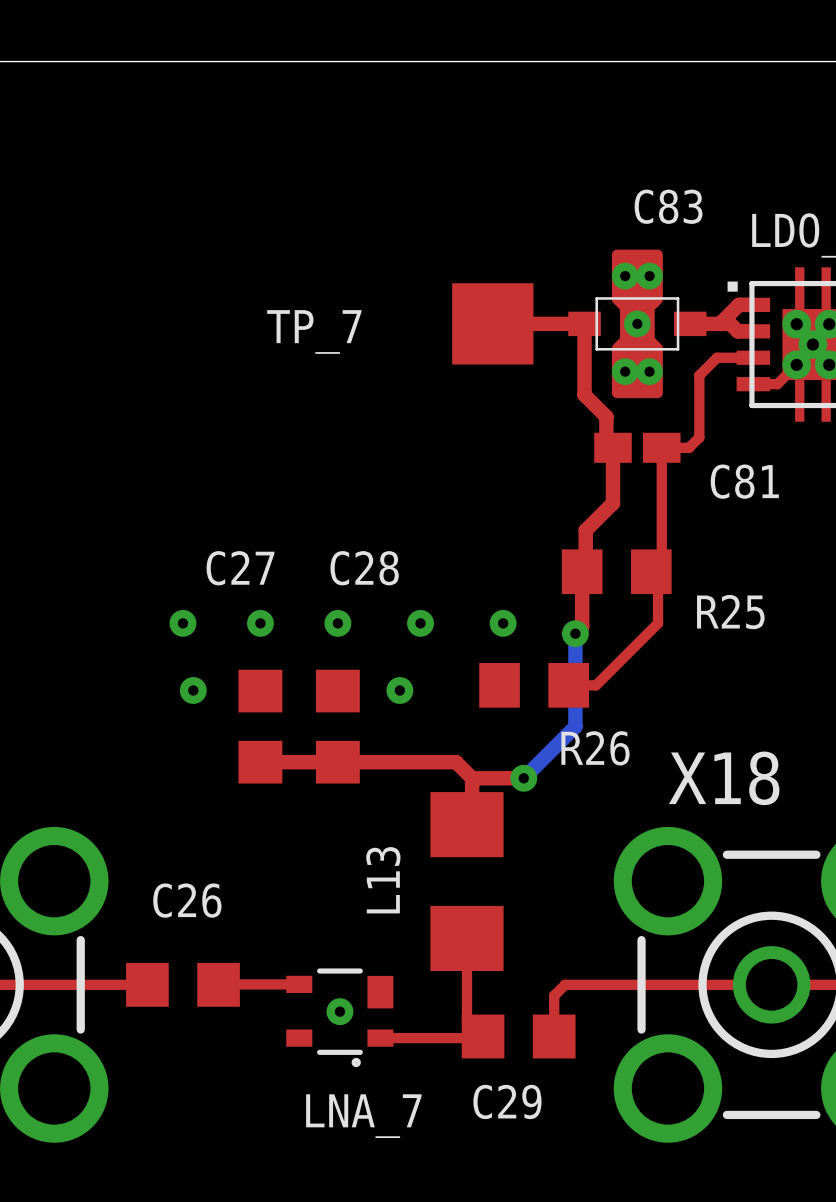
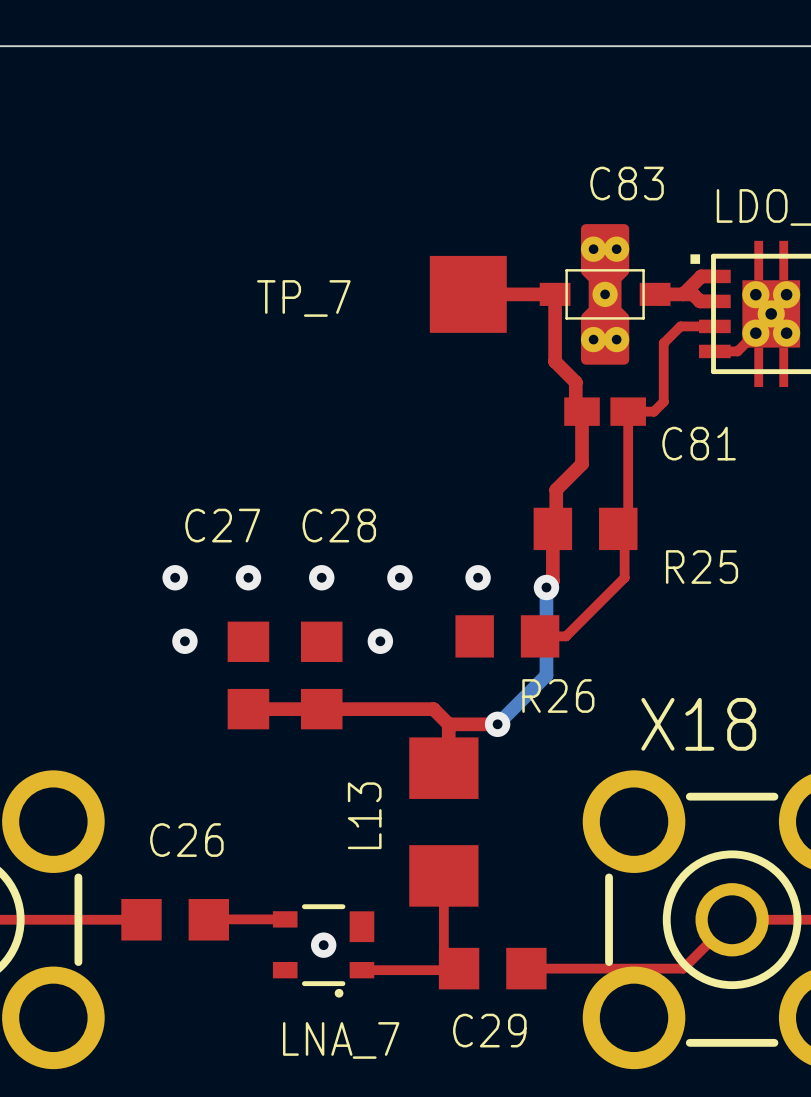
top track: (771, 984) (565, 984) (554, 995) (554, 1036) -> (732, 919) (683, 968) (526, 968)

